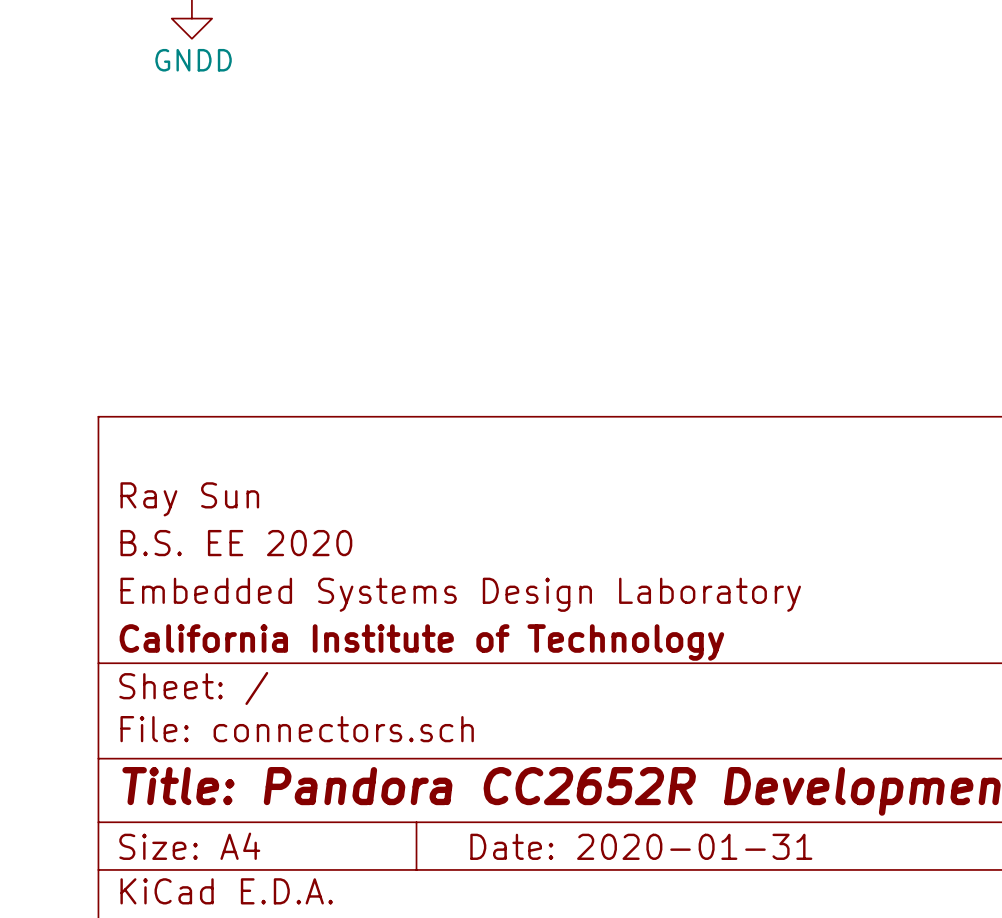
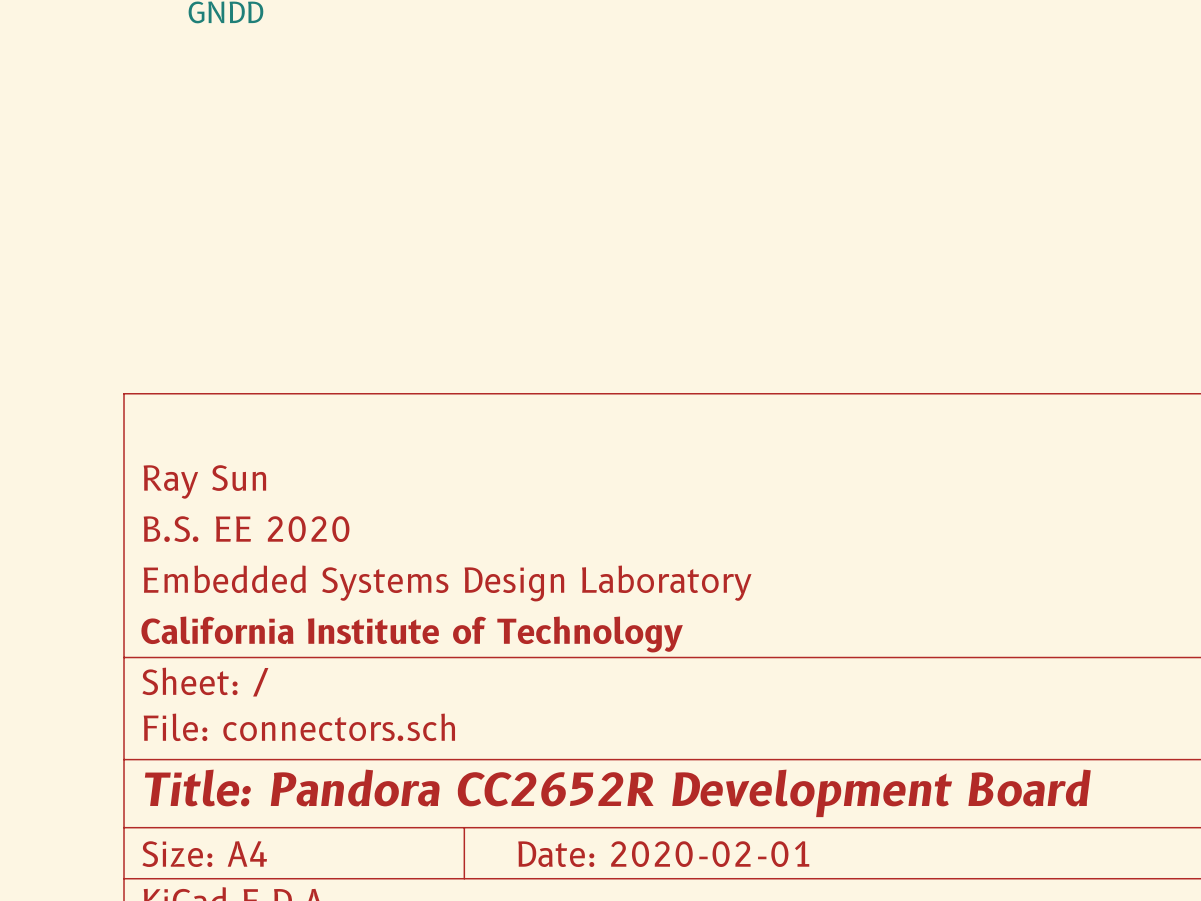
title block: Date: 2020-01-31 (641, 846) -> Date: 2020-02-01 (663, 854)

